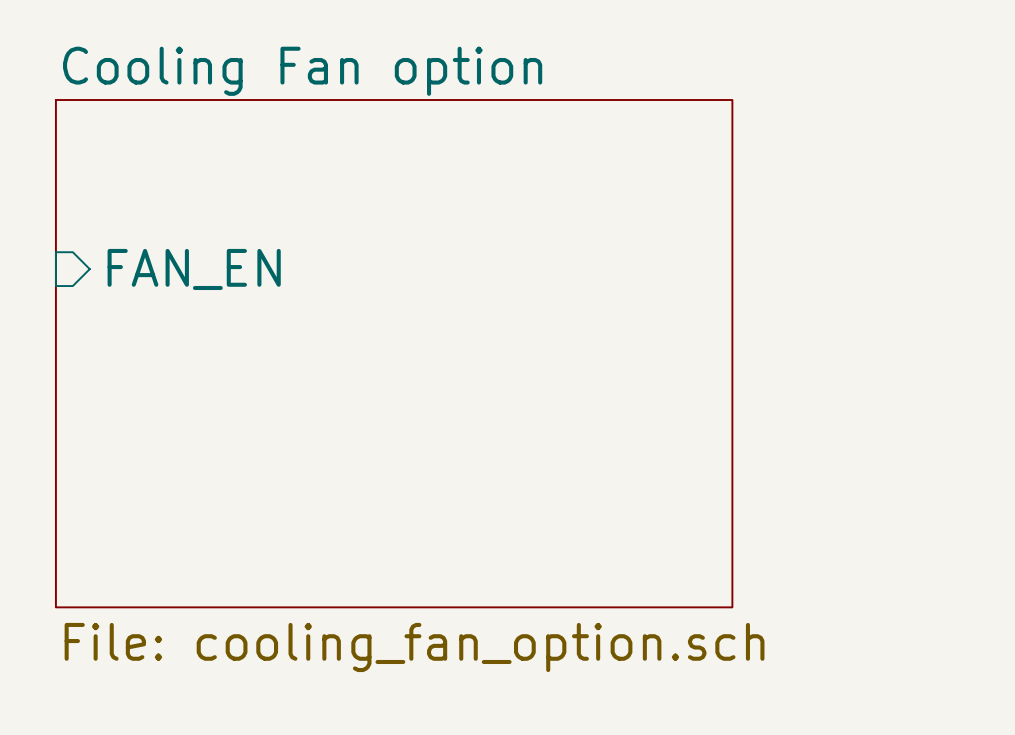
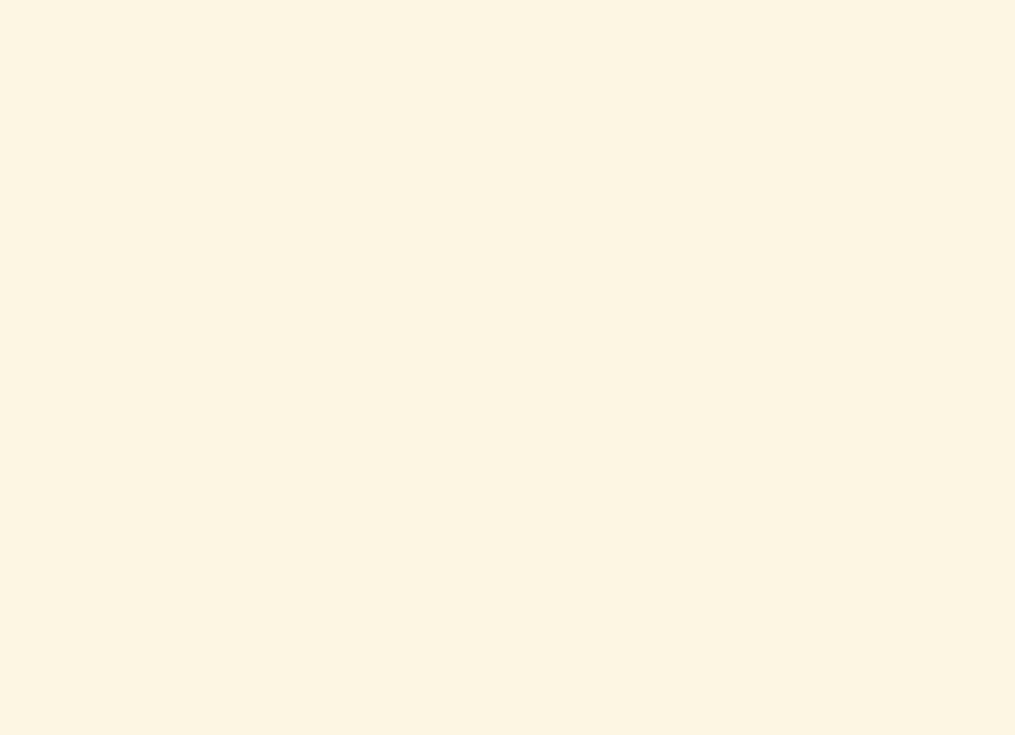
sheet pin: FAN_EN (194, 269) -> none
sheet Cooling Fan option: File: cooling_fan_option.sch (394, 353) -> none

